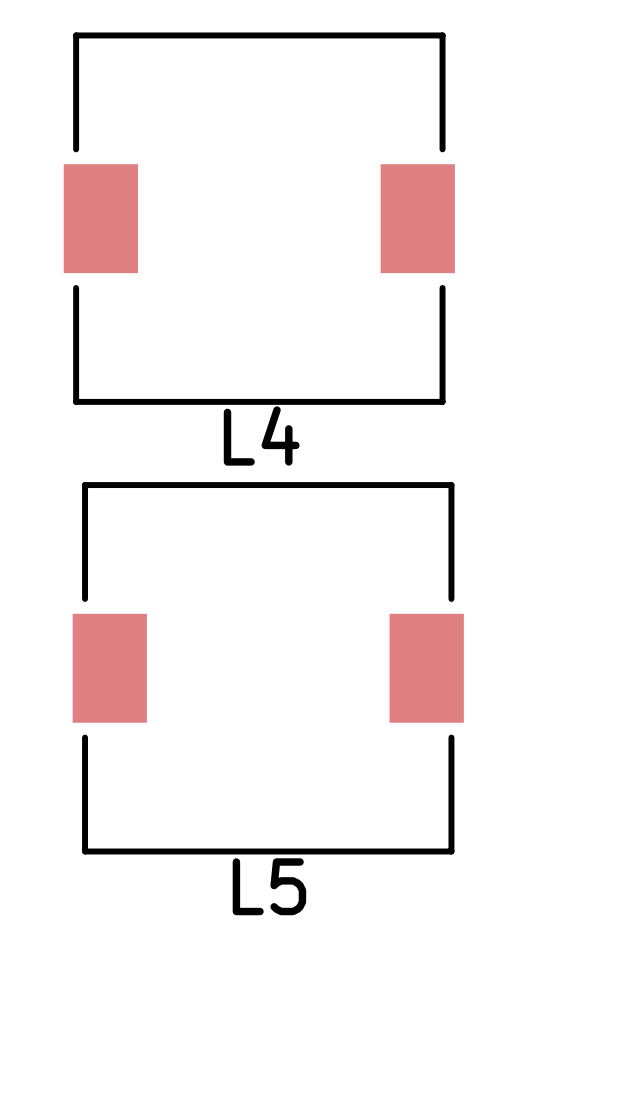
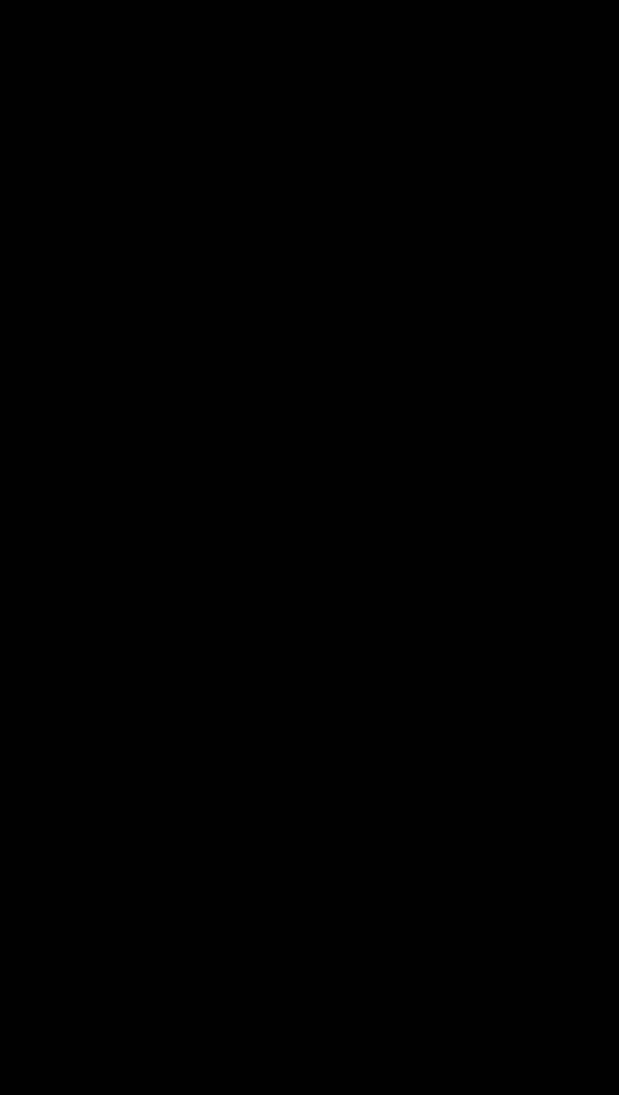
L4: (259, 218) -> none
L5: (268, 668) -> none

